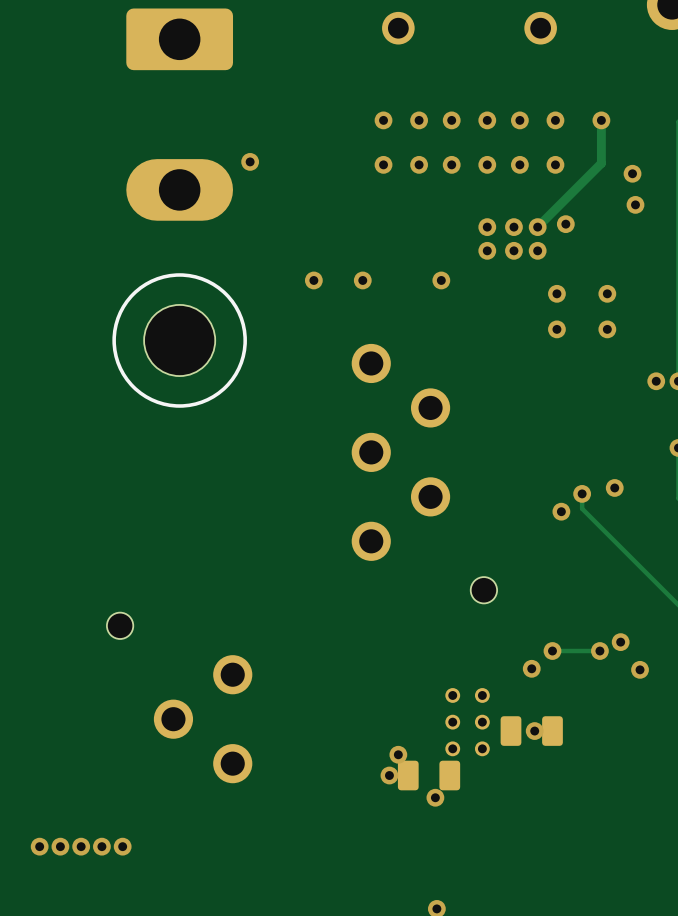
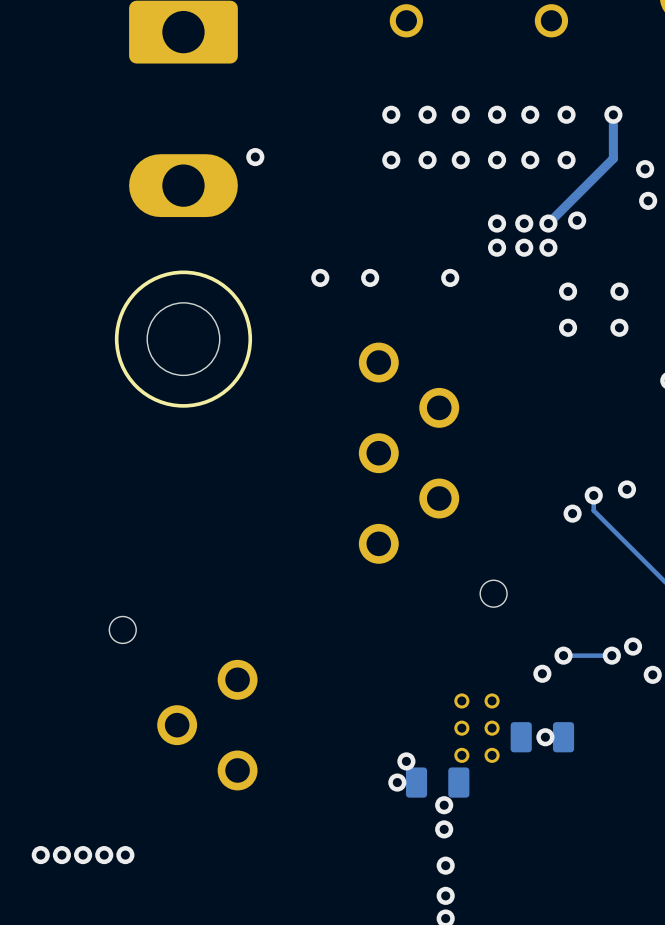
via: none -> (444, 829)
via: none -> (445, 865)
via: none -> (445, 895)

